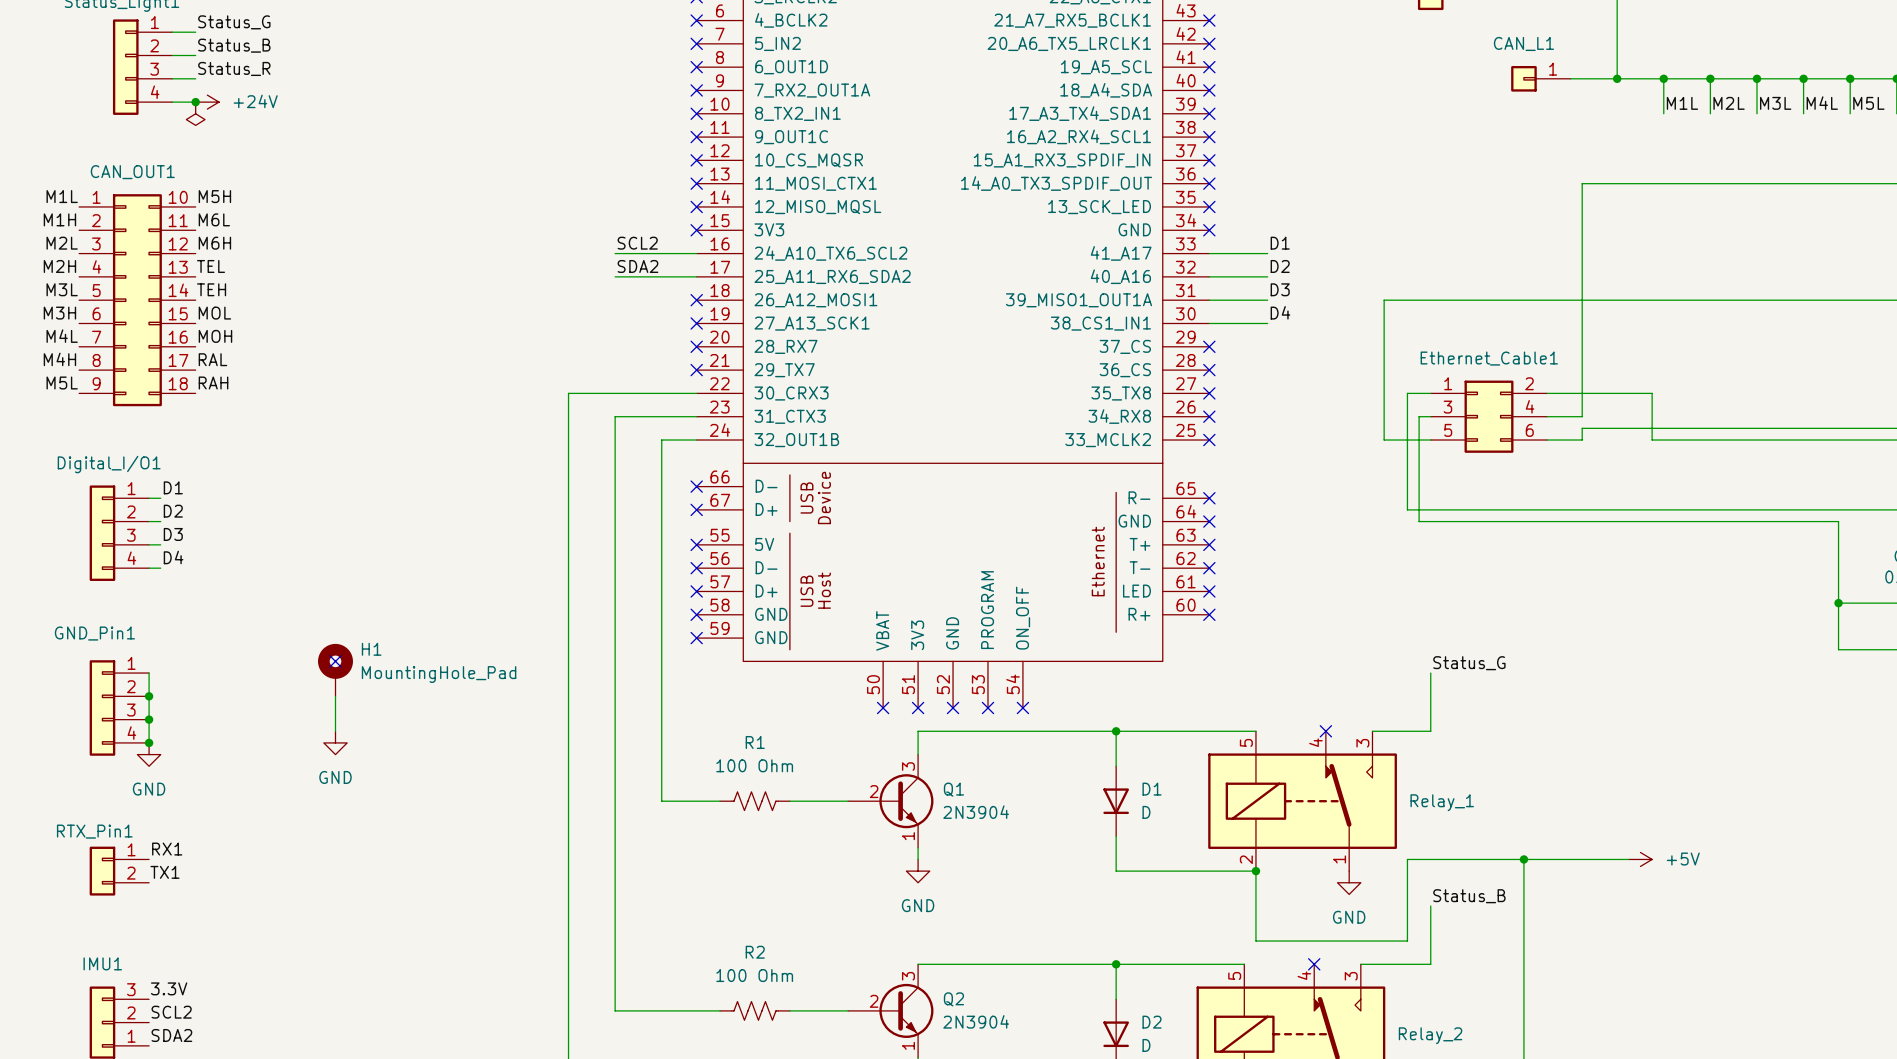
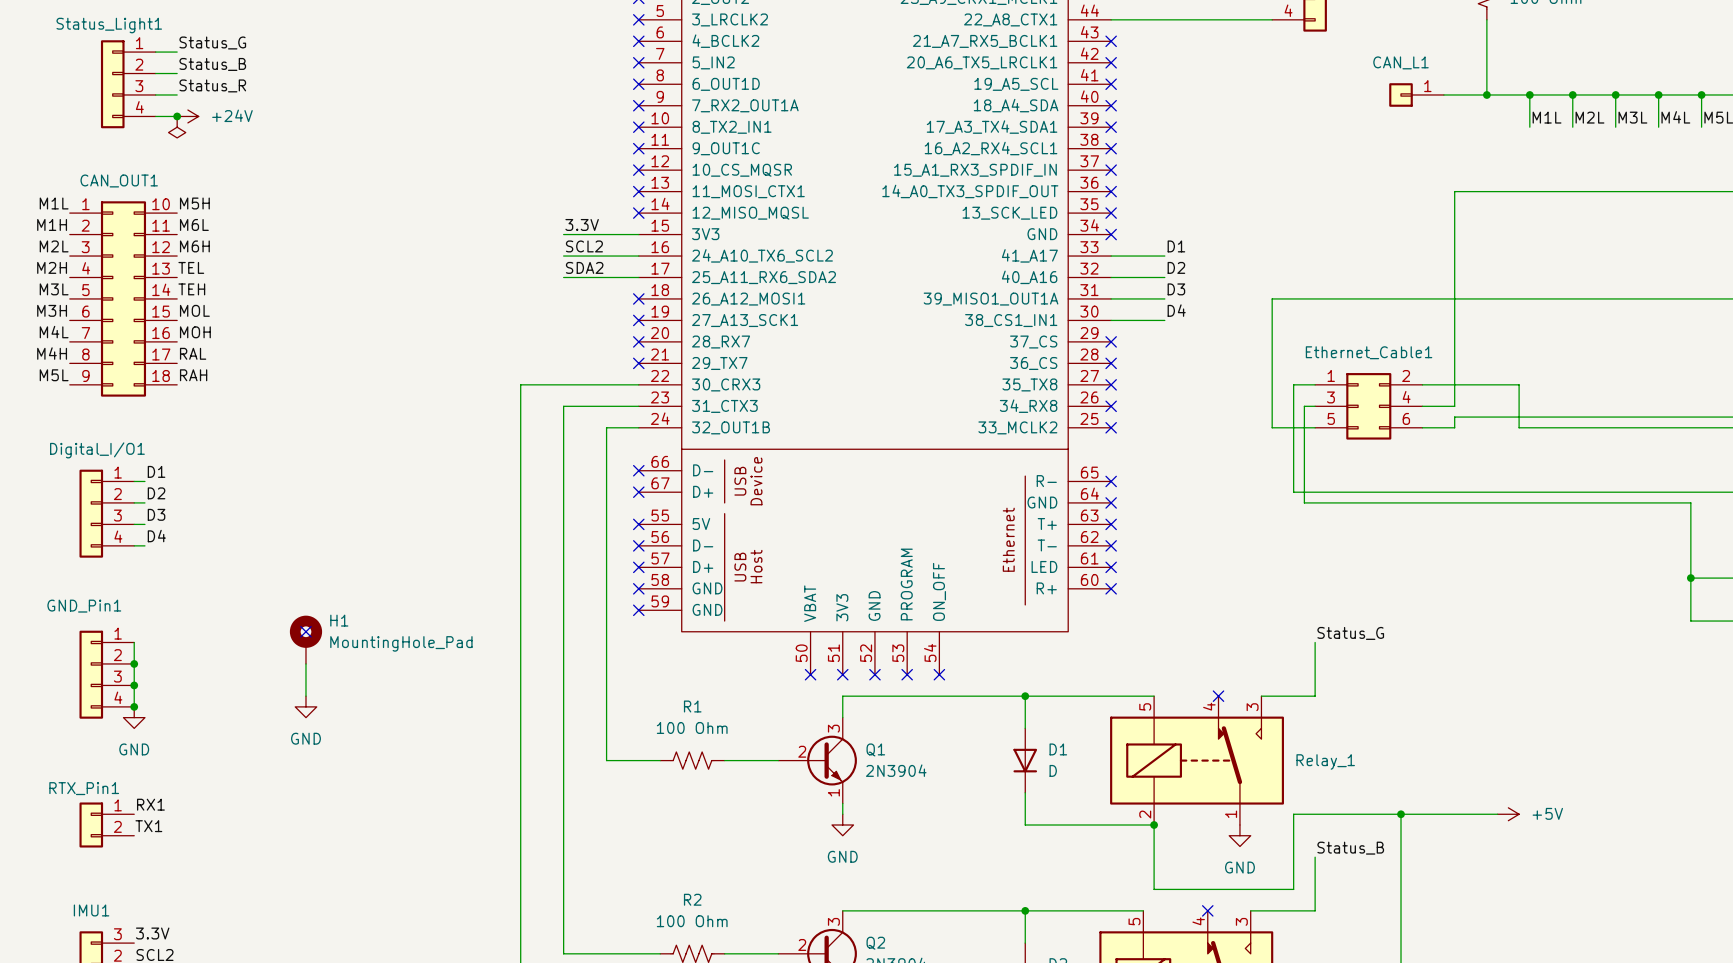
label: none -> 3.3V (582, 224)
wire: none -> (563, 234) (638, 234)
no-connect mark: (696, 230) -> none

